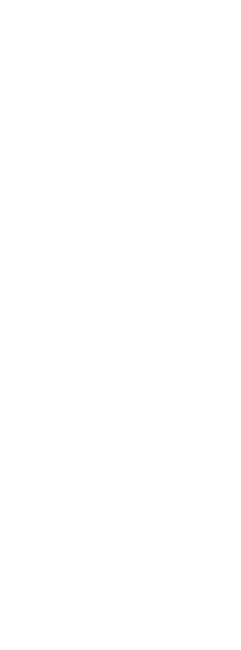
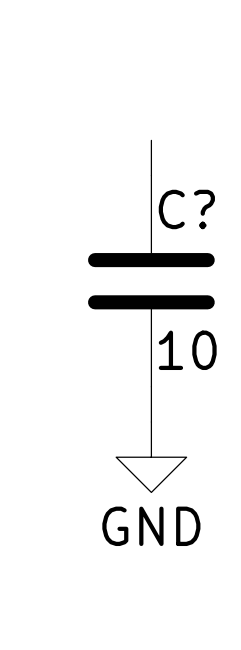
wire: none -> (151, 140) (151, 175)
C?: none -> 10 (151, 281)
wire: none -> (151, 386) (151, 422)
power symbol: none -> GND (151, 457)

